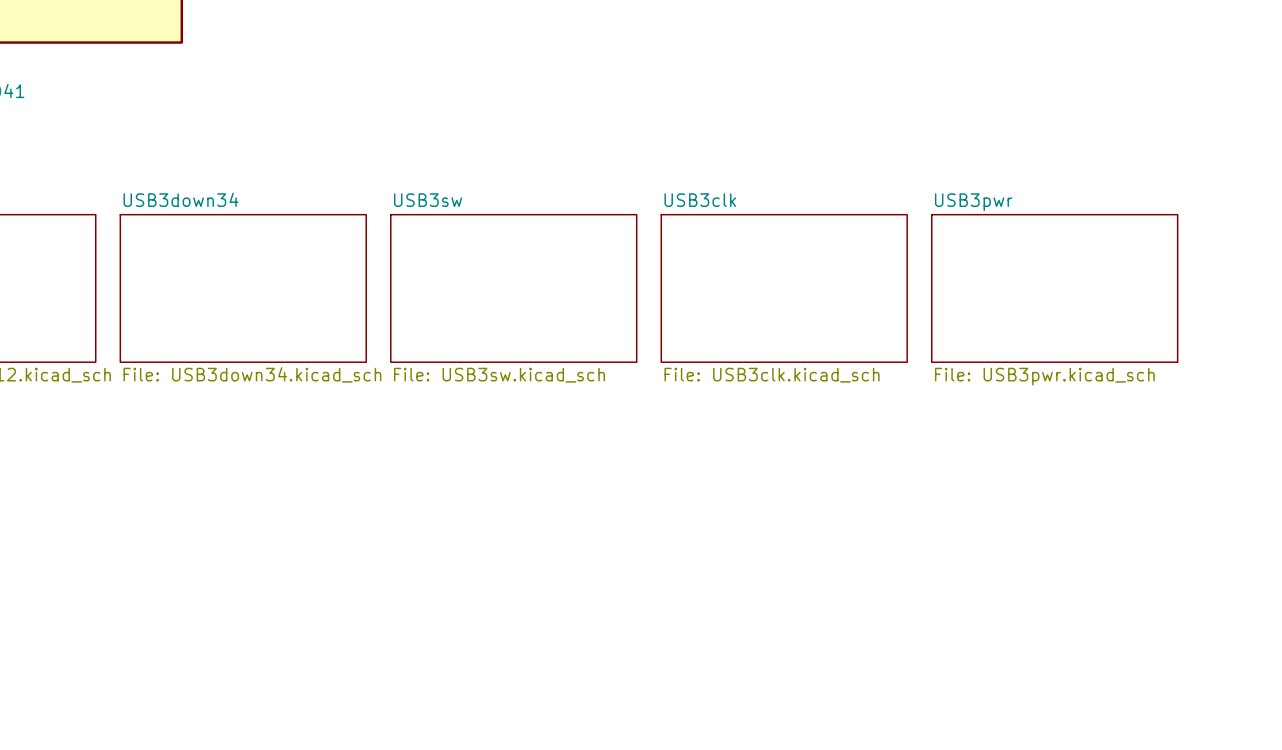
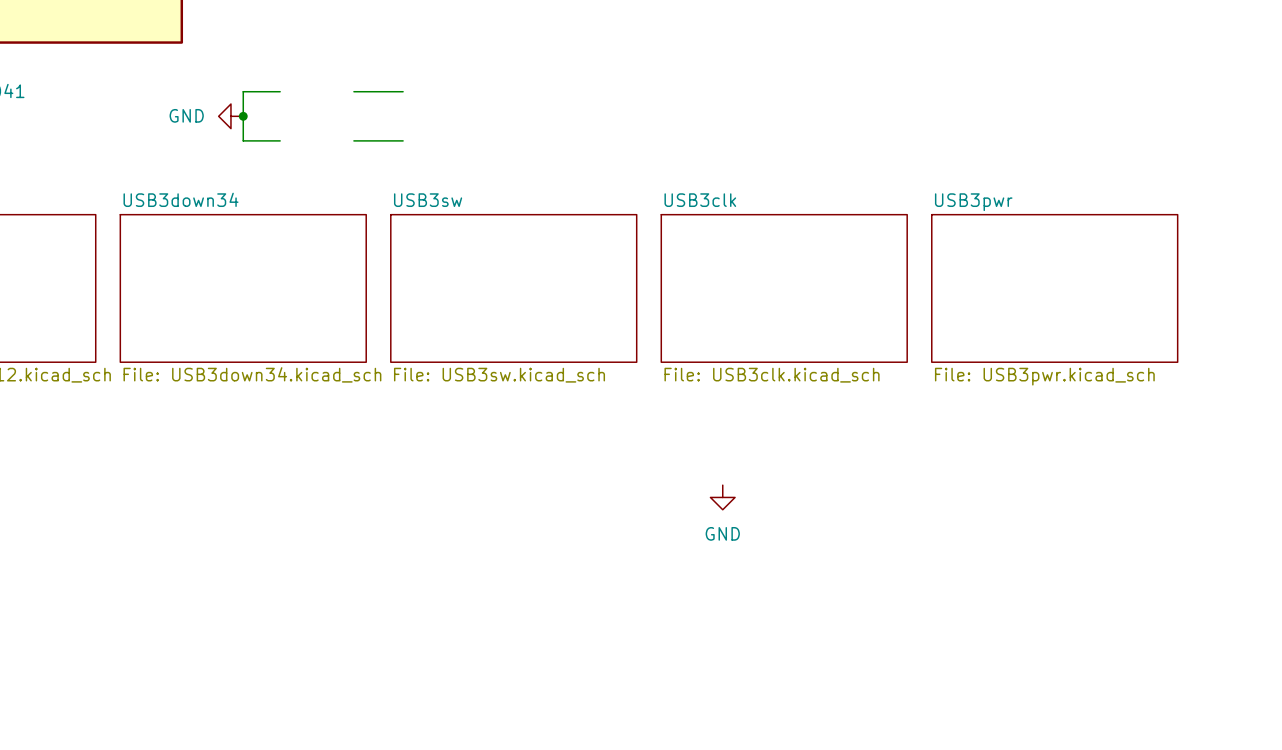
wire: none -> (280, 91) (243, 91) (243, 140) (280, 140)
wire: none -> (353, 91) (403, 91)
power symbol: none -> GND (230, 116)
junction: none -> (243, 116)
wire: none -> (353, 140) (403, 140)
power symbol: none -> GND (722, 497)

